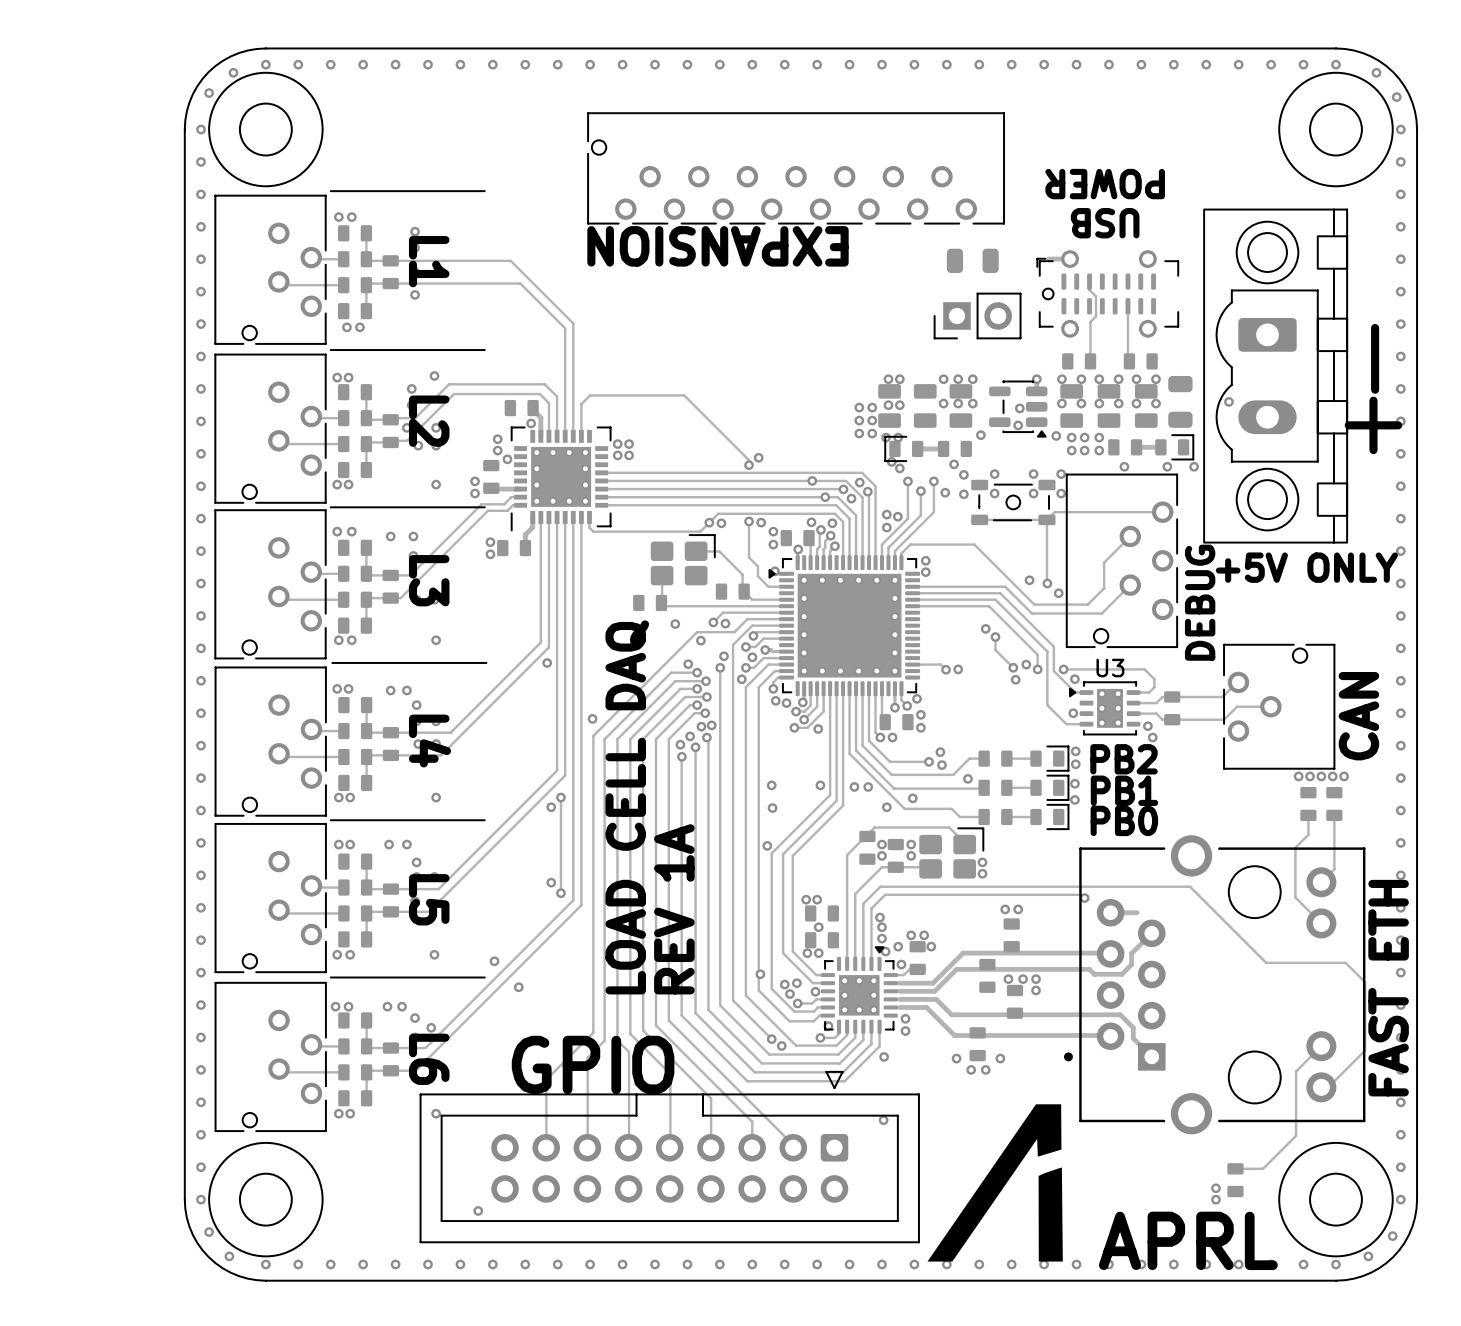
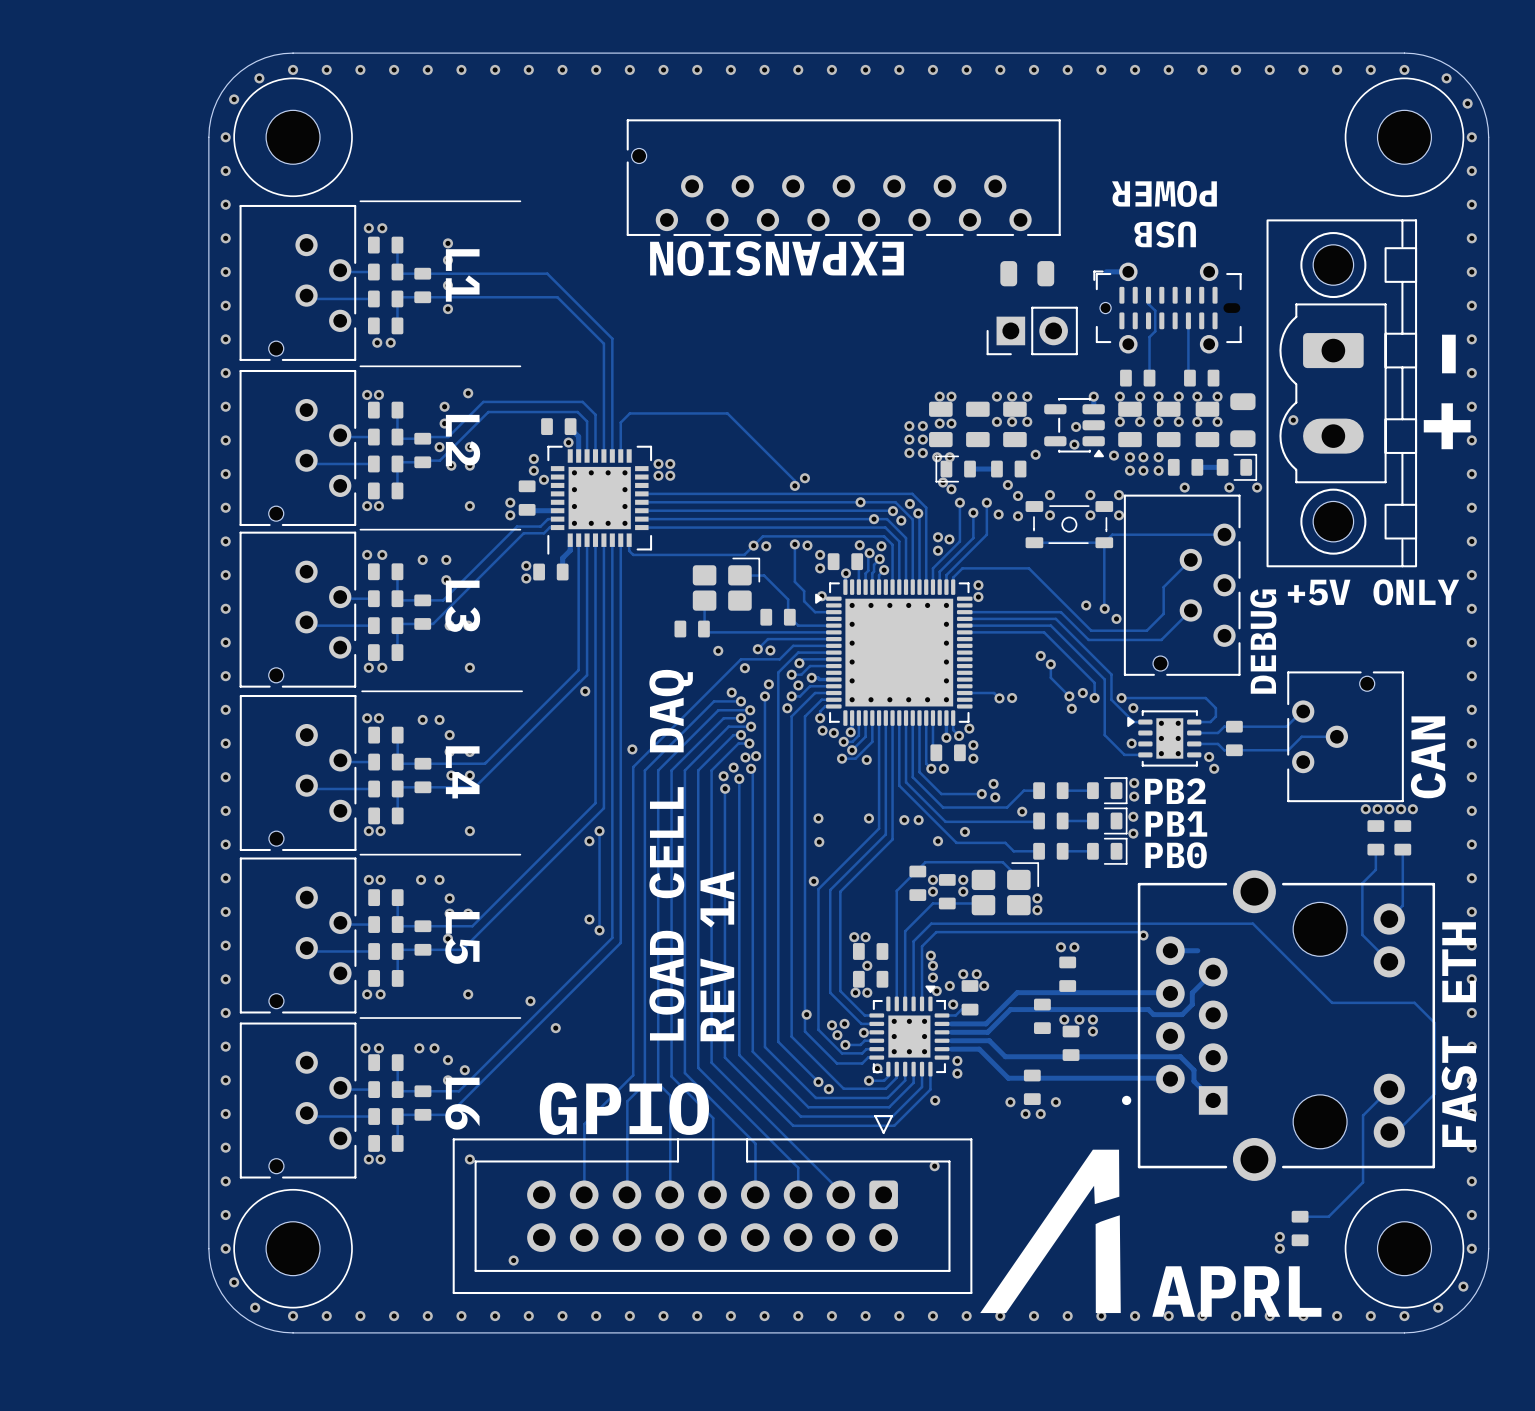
U3 name: U3 (1110, 668) -> none

